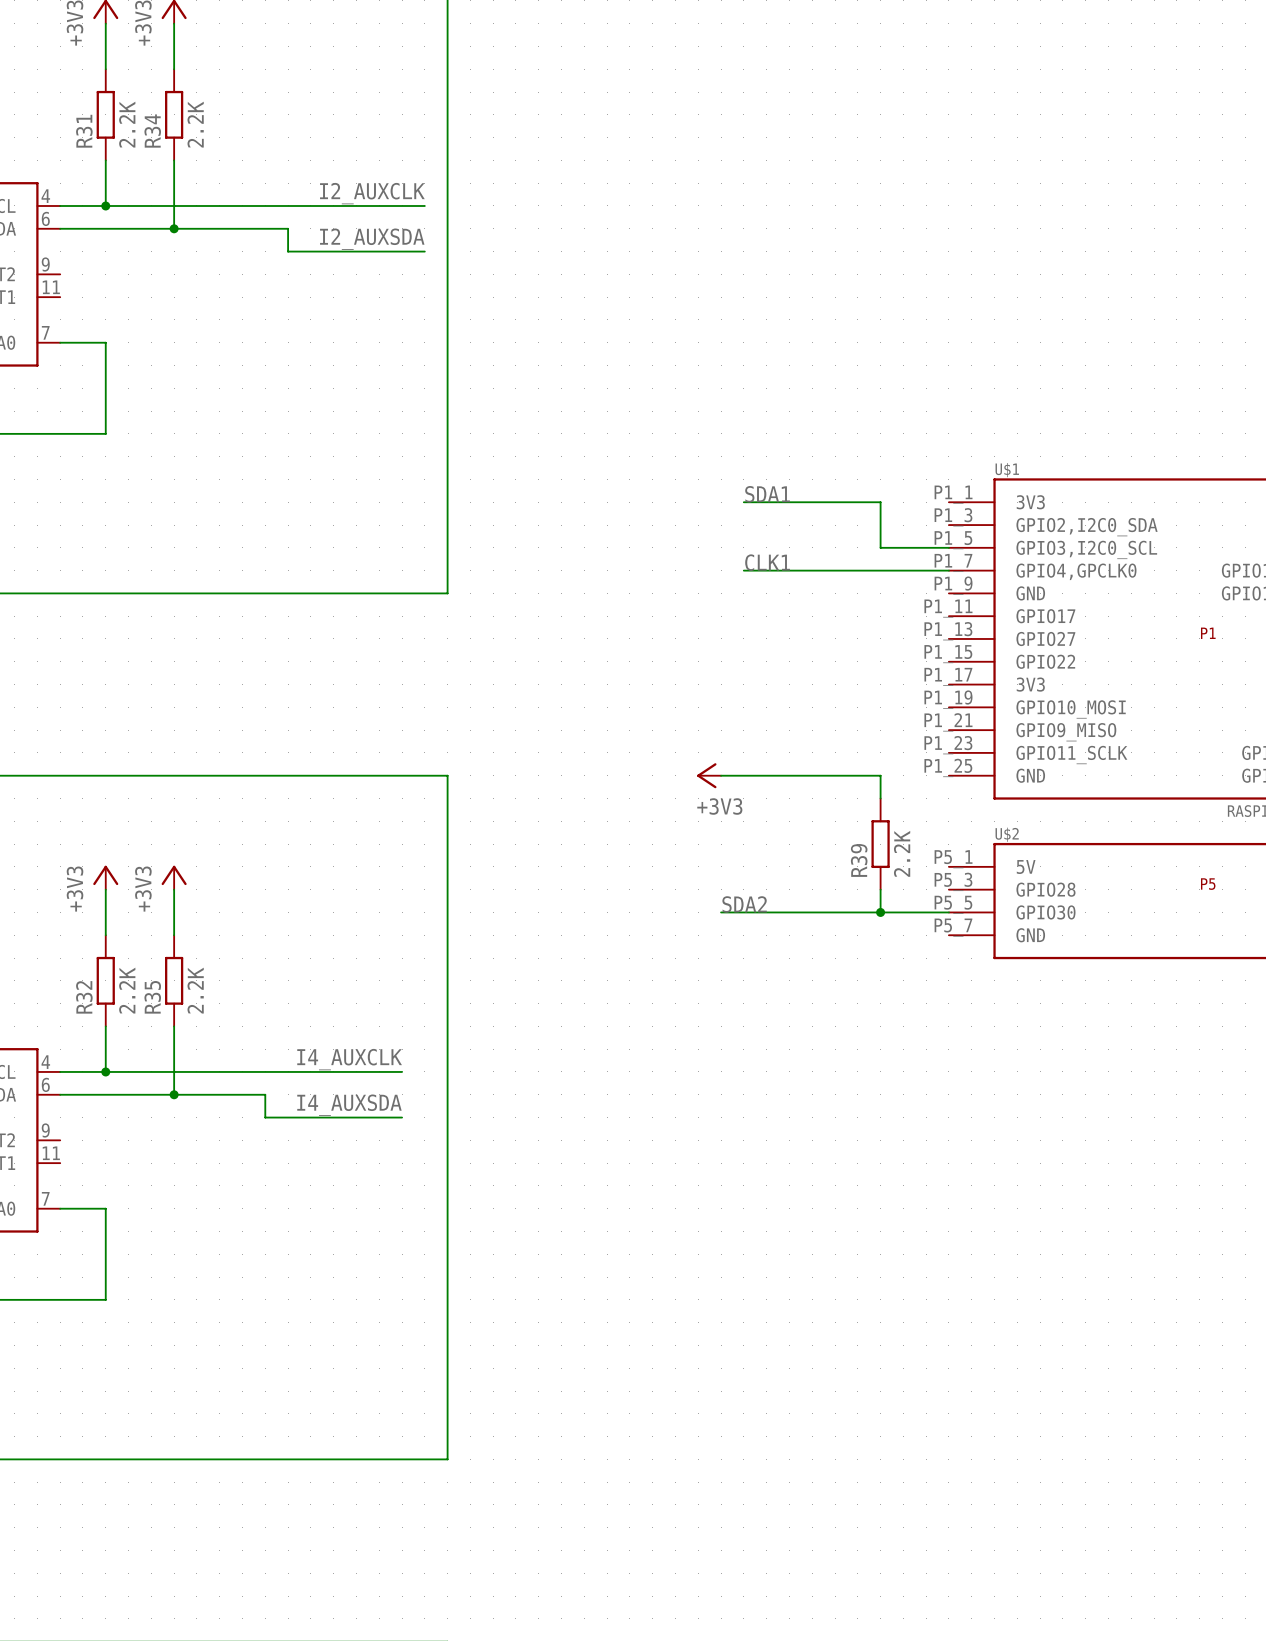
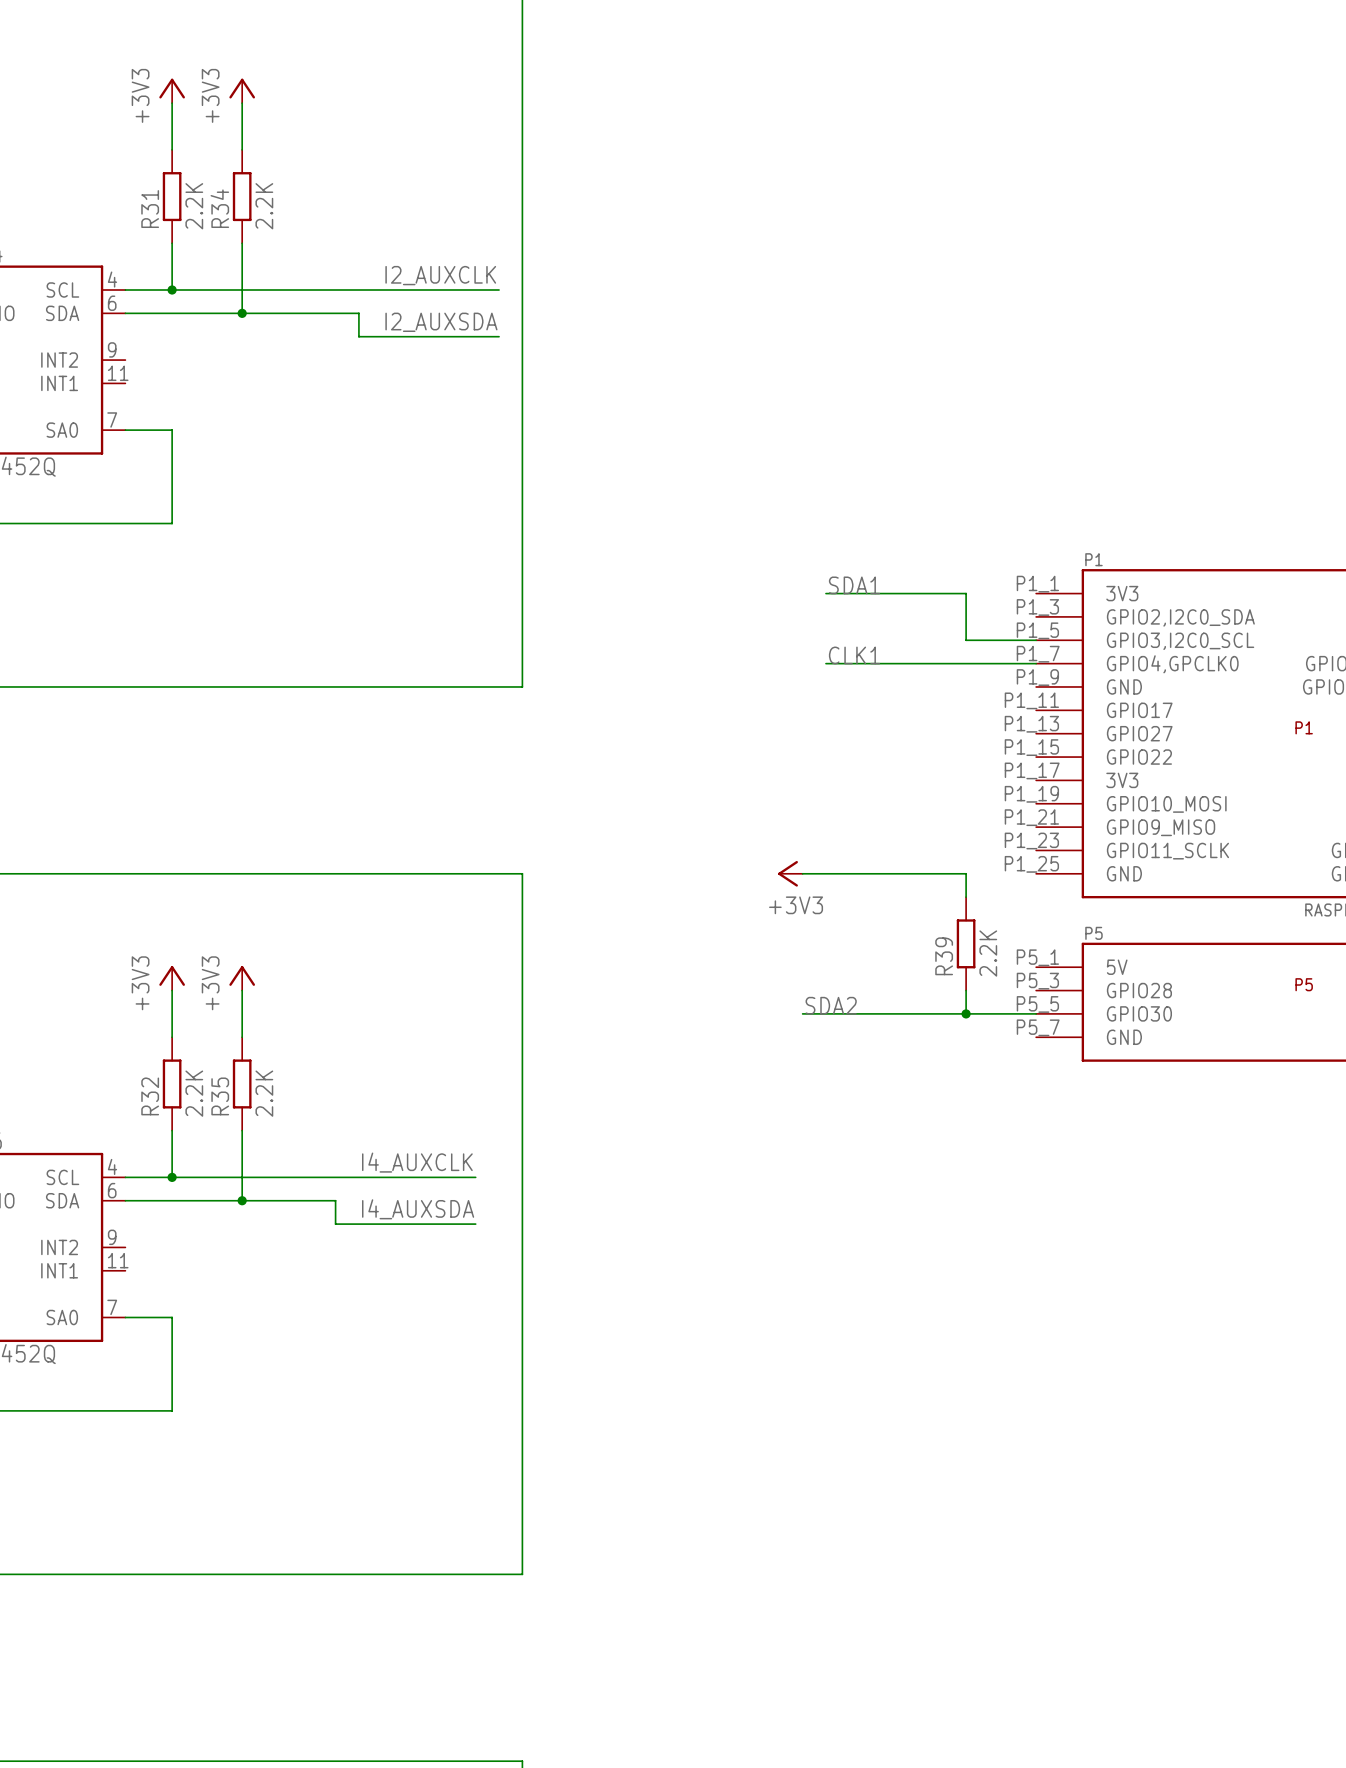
U$1 name: U$1 (1007, 470) -> P1 (1093, 559)
U$2 name: U$2 (1007, 834) -> P5 (1093, 933)

